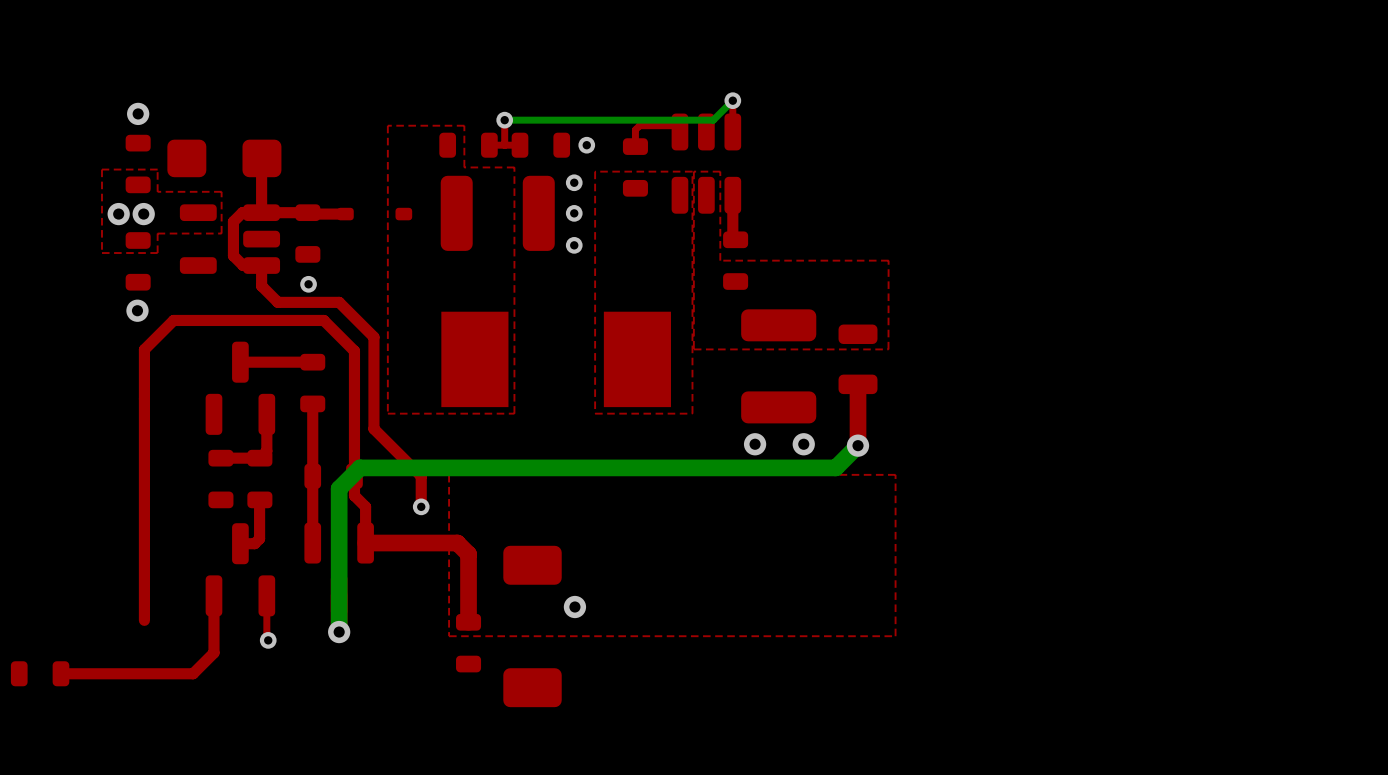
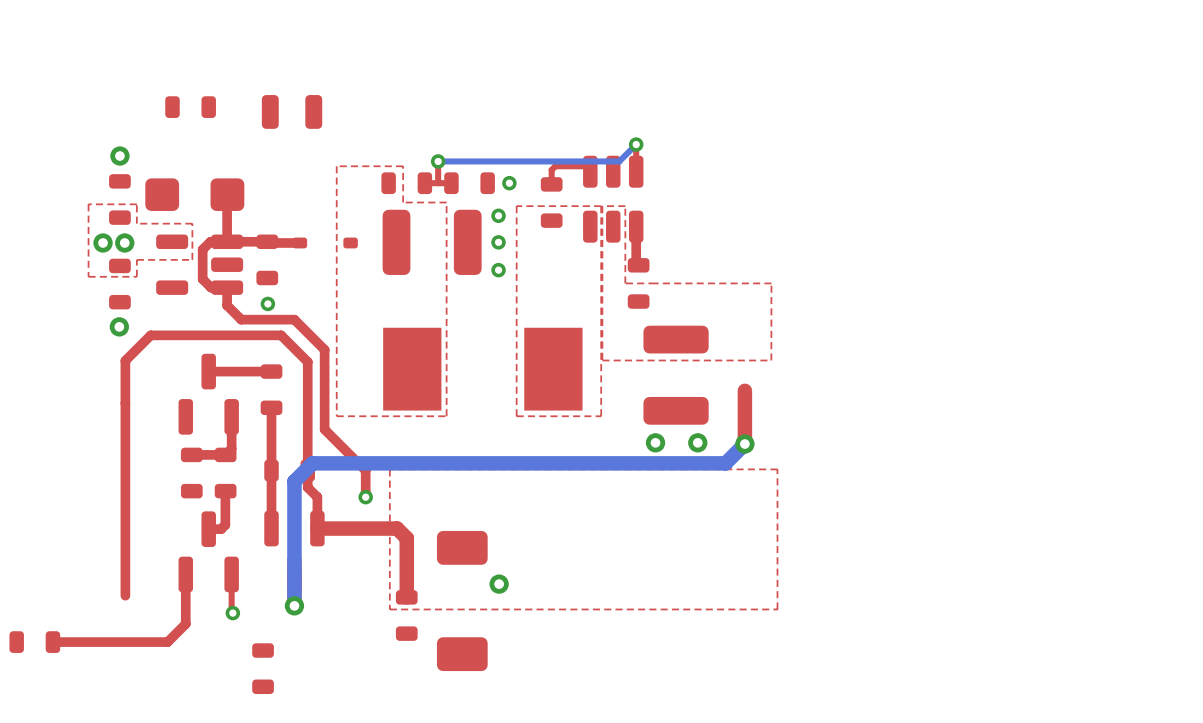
part: none -> (190, 107)
part rotation: 0° (858, 359) -> 90° clockwise (292, 111)
part position: (858, 359) -> (292, 111)
part: none -> (263, 668)

